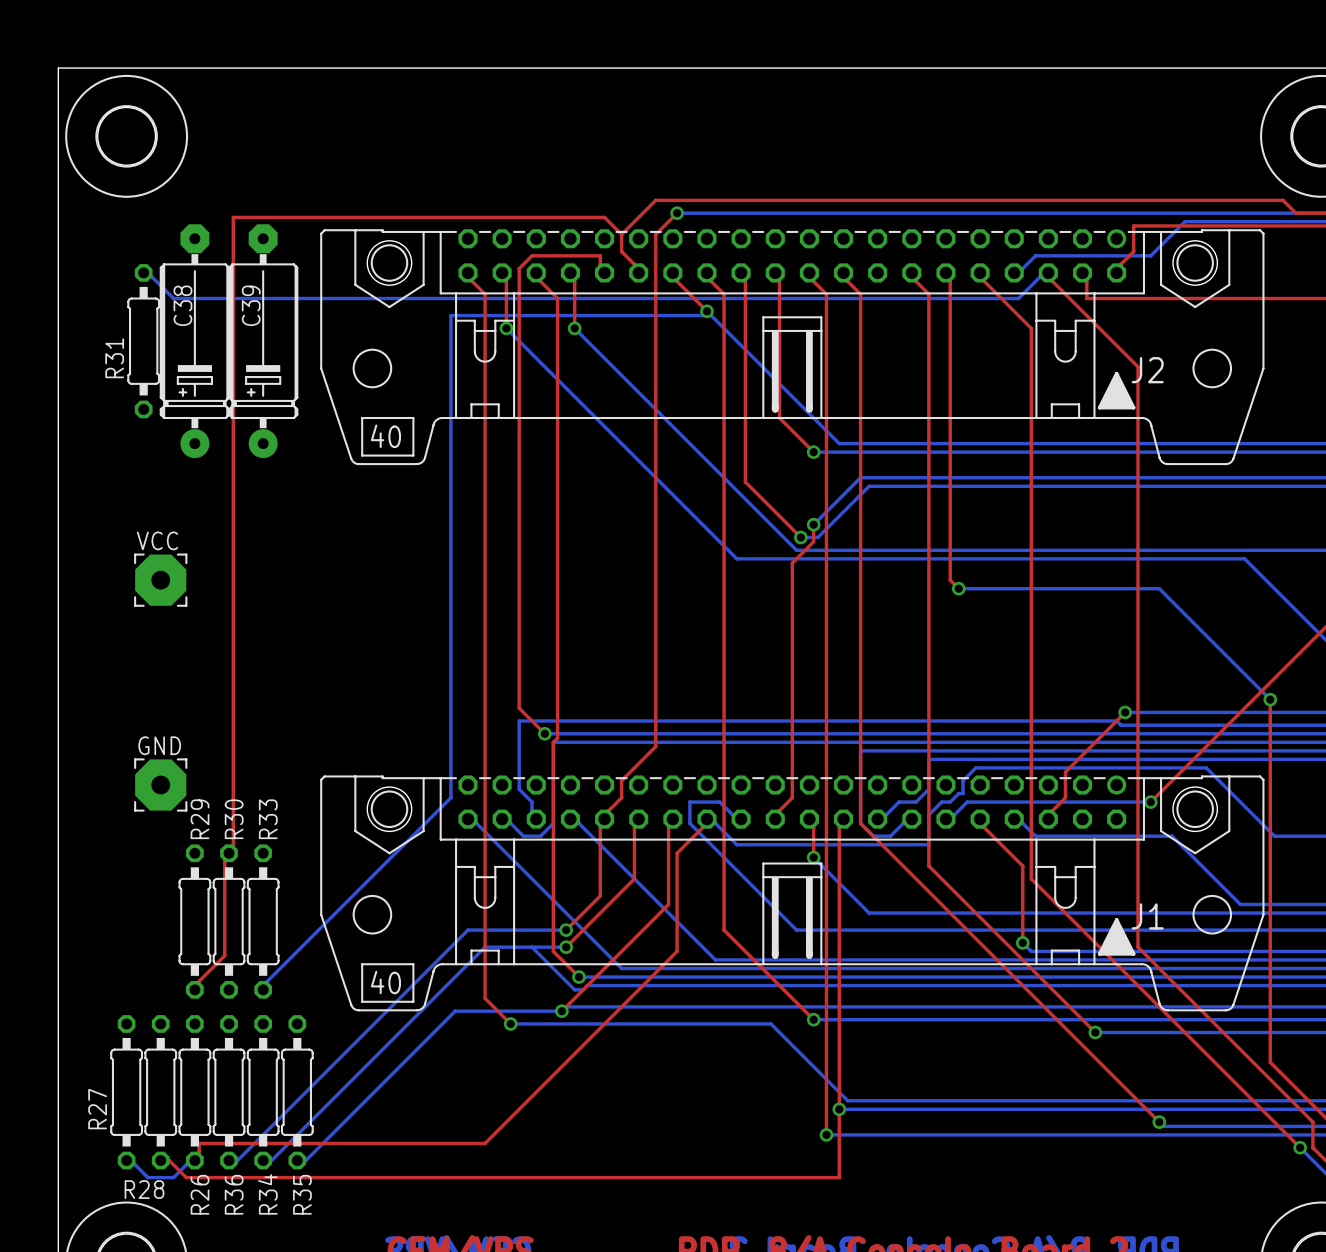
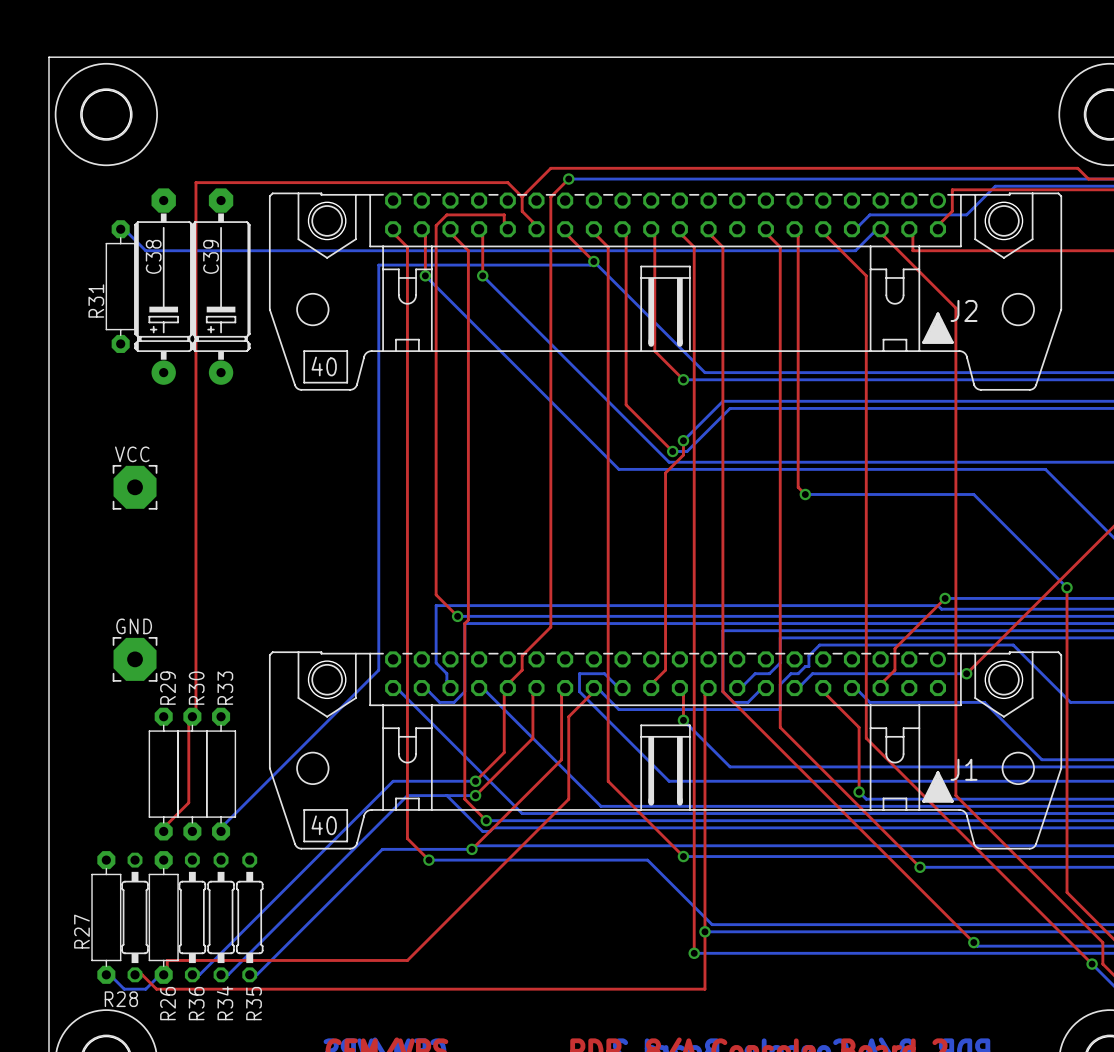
R31 footprint: [127, 264, 161, 419] -> [105, 220, 136, 353]
R29 footprint: [178, 844, 212, 999] -> [148, 707, 179, 841]
R30 footprint: [212, 844, 246, 999] -> [177, 707, 208, 841]
R33 footprint: [246, 844, 280, 999] -> [206, 707, 237, 841]
R27 footprint: [110, 1015, 144, 1170] -> [91, 851, 122, 984]
R26 footprint: [178, 1015, 212, 1170] -> [148, 851, 179, 984]

